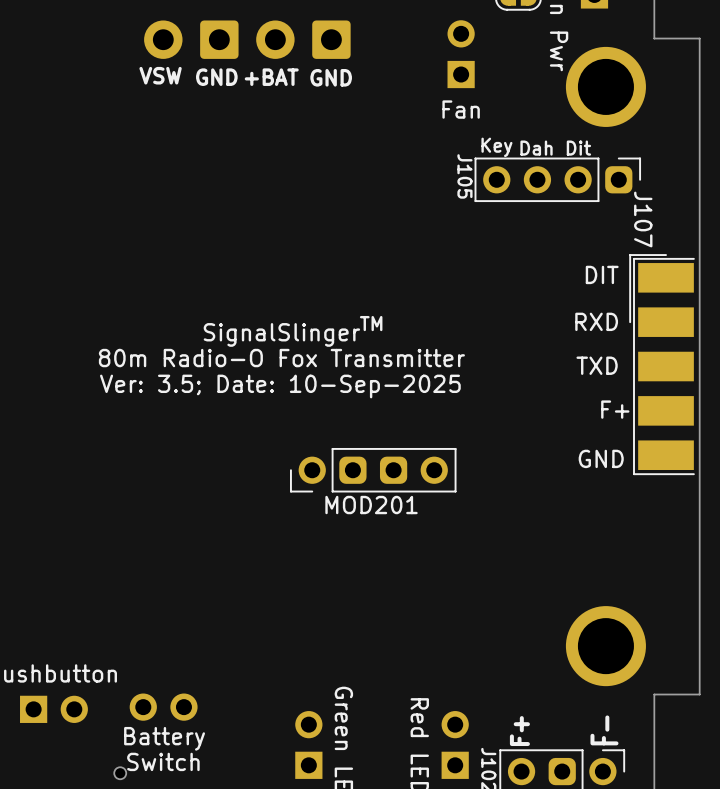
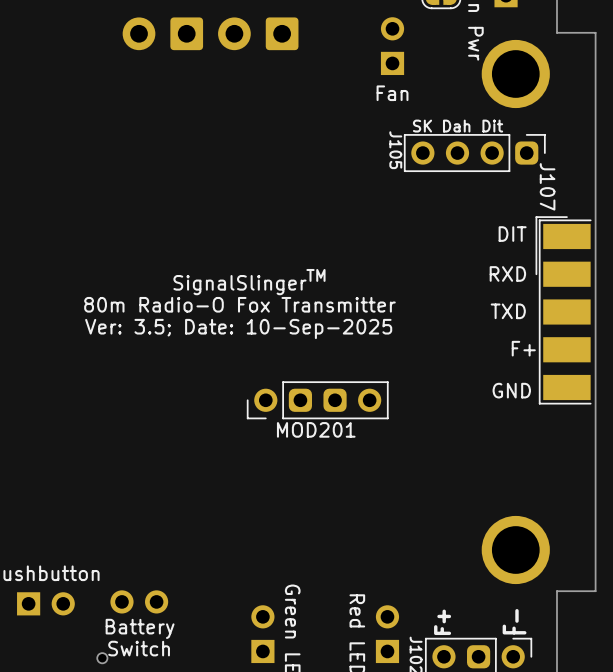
text: VSW (160, 75) -> none
text: GND (216, 77) -> none
text: +BAT (271, 77) -> none
text: GND (331, 77) -> none
text: Key (496, 147) -> SK (422, 126)

